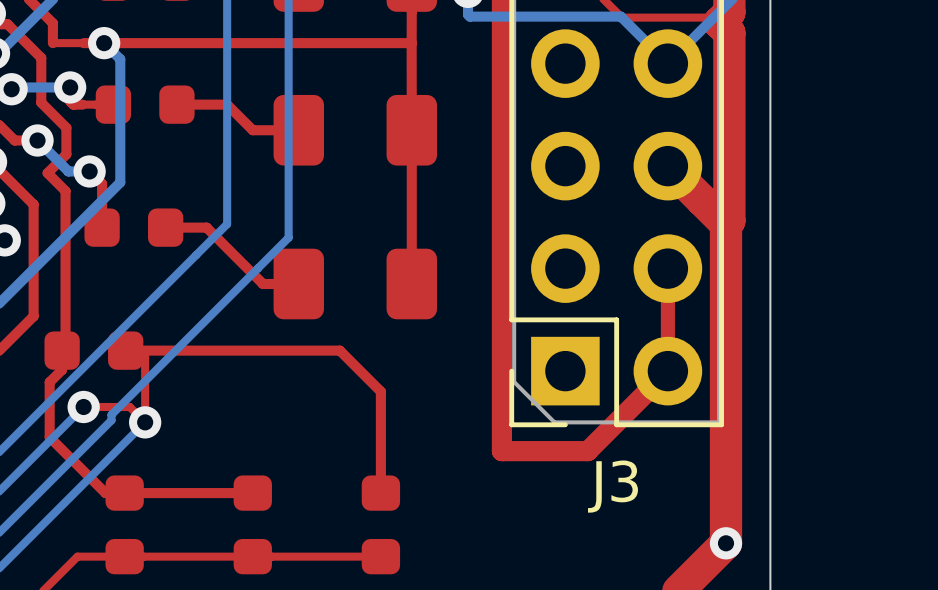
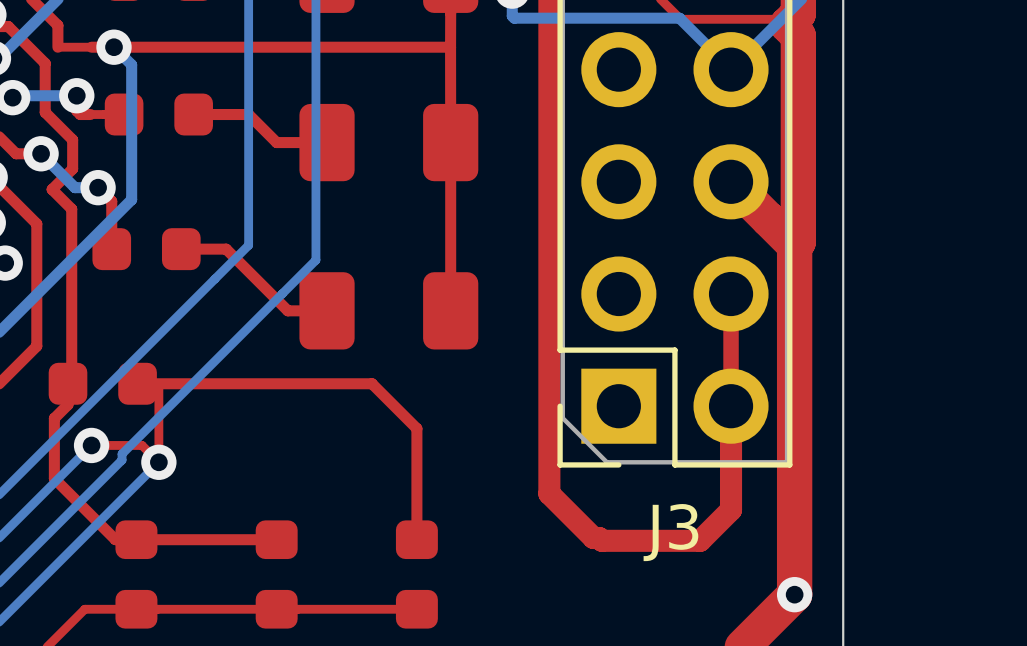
top track: (667, 371) (587, 451) (501, 451) -> (731, 406) (731, 509) (700, 540) (602, 540) (599, 538) (593, 538) (549, 493)

